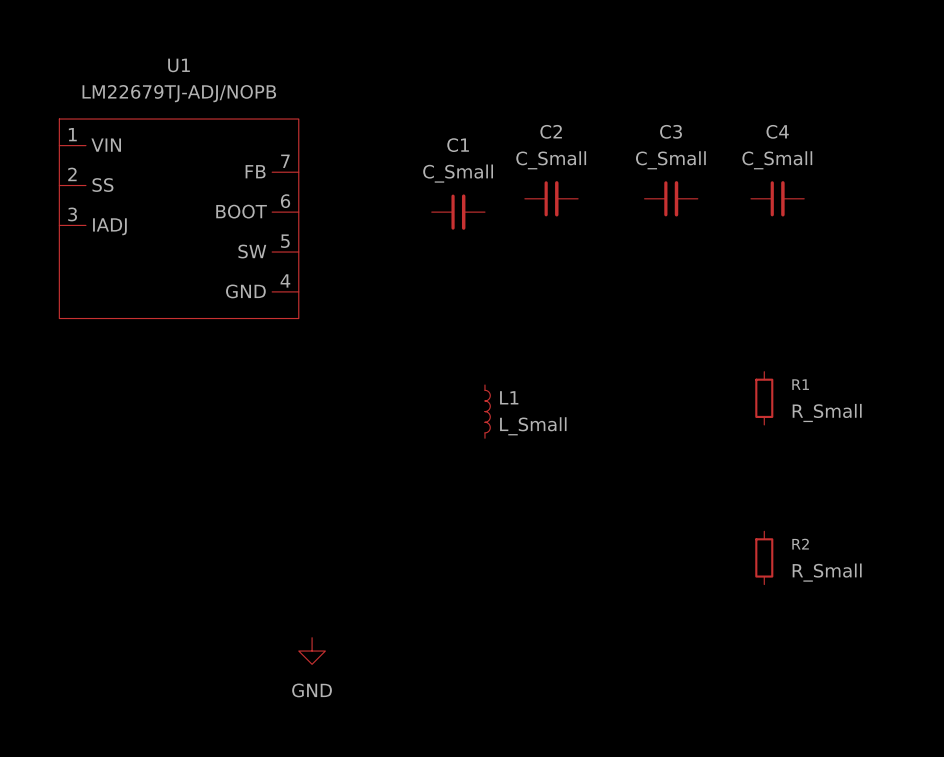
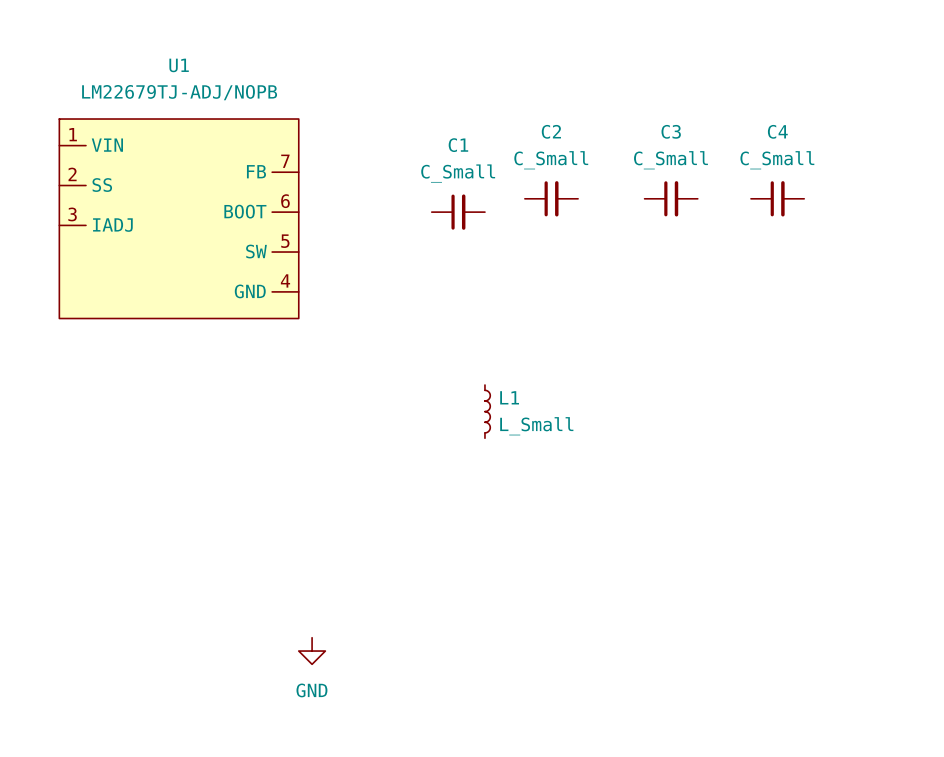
R1: R_Small (764, 398) -> none
R2: R_Small (764, 557) -> none

